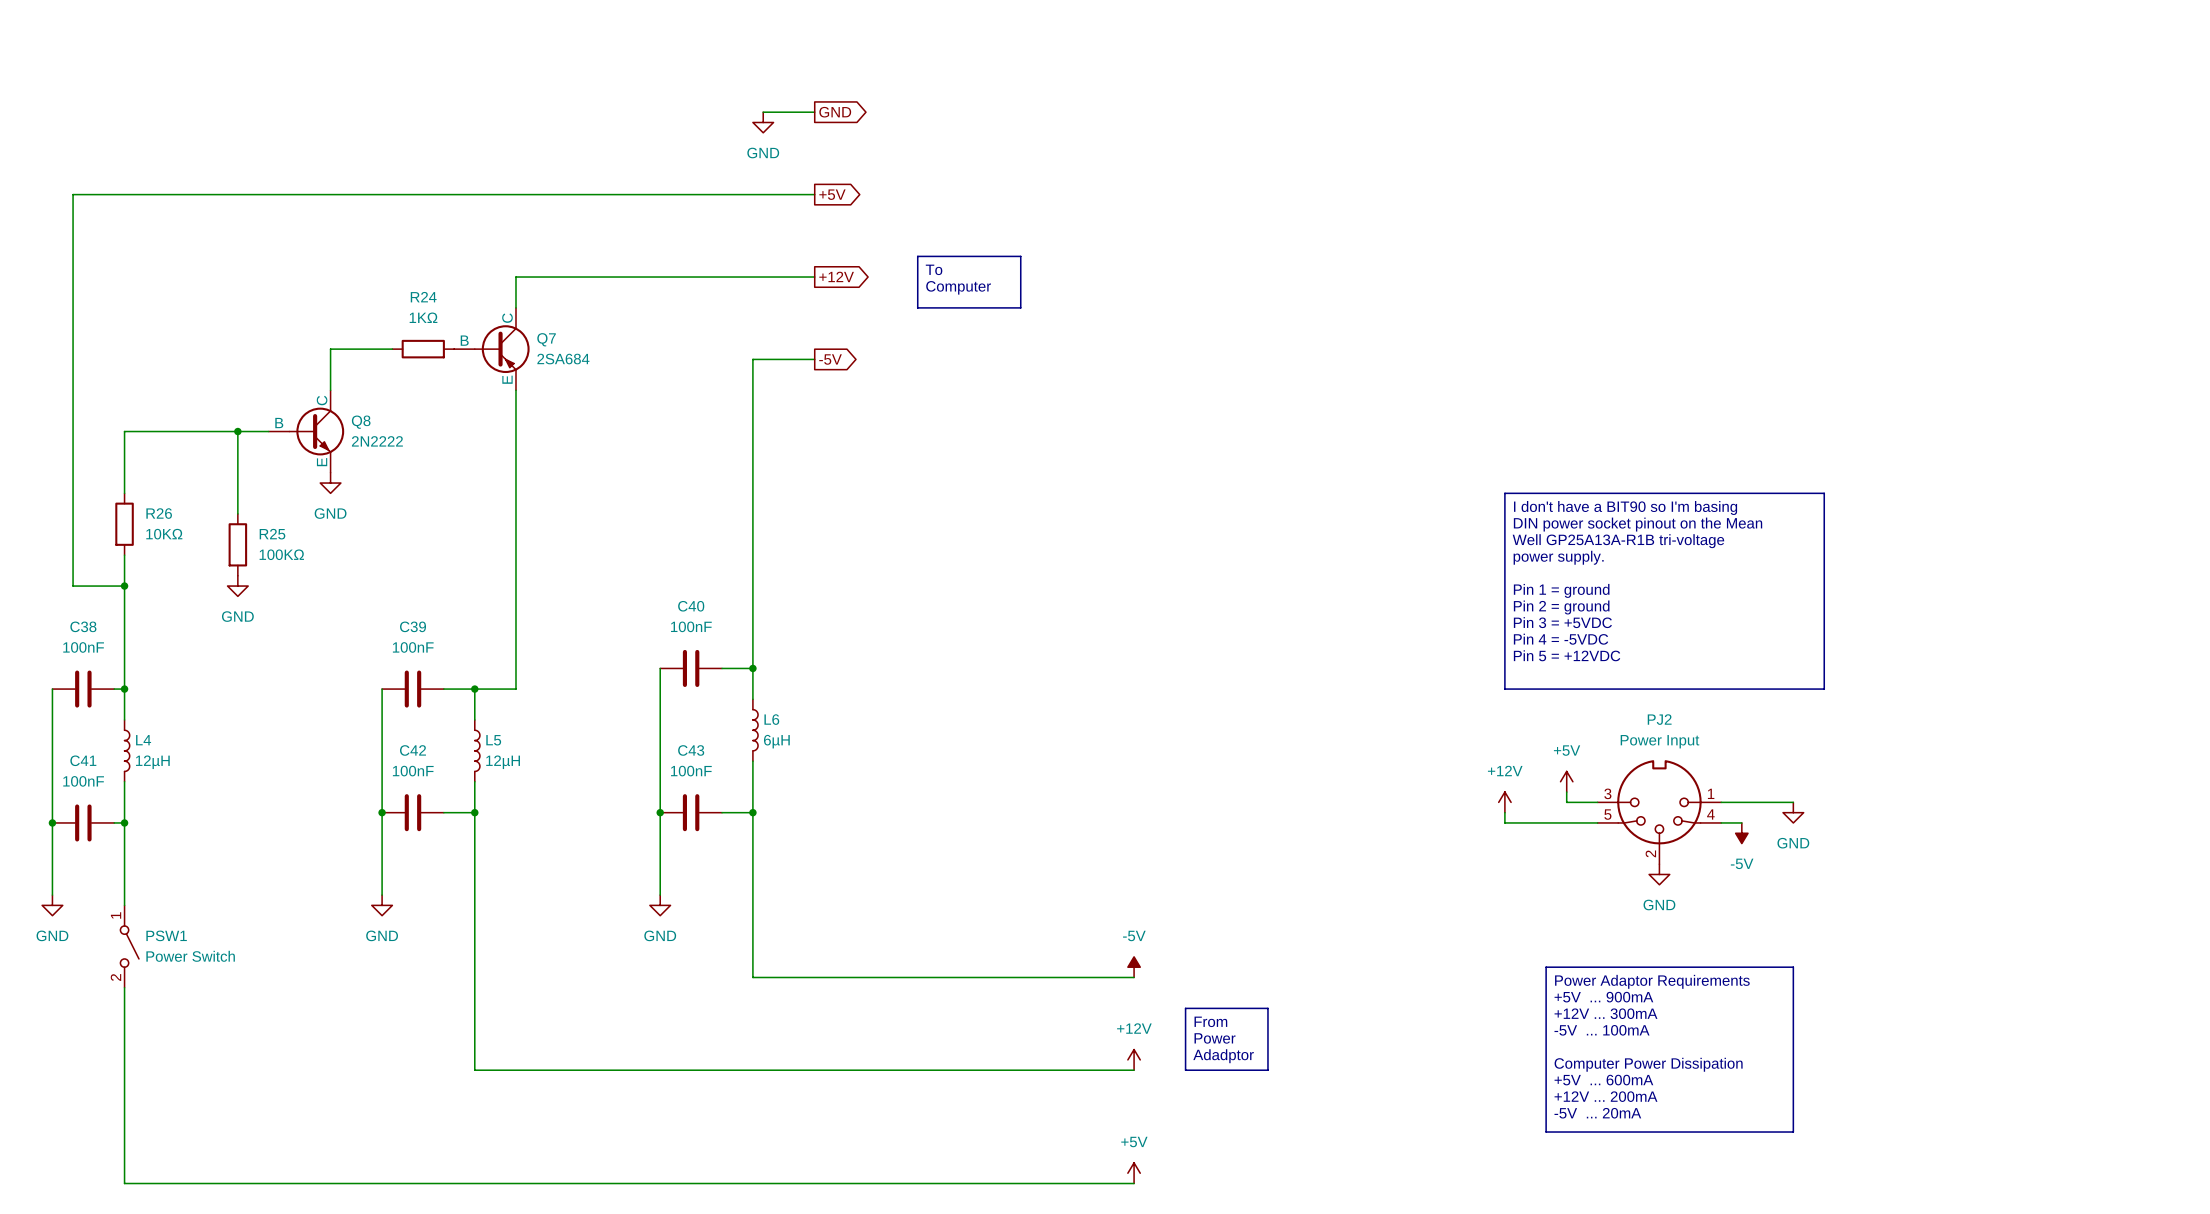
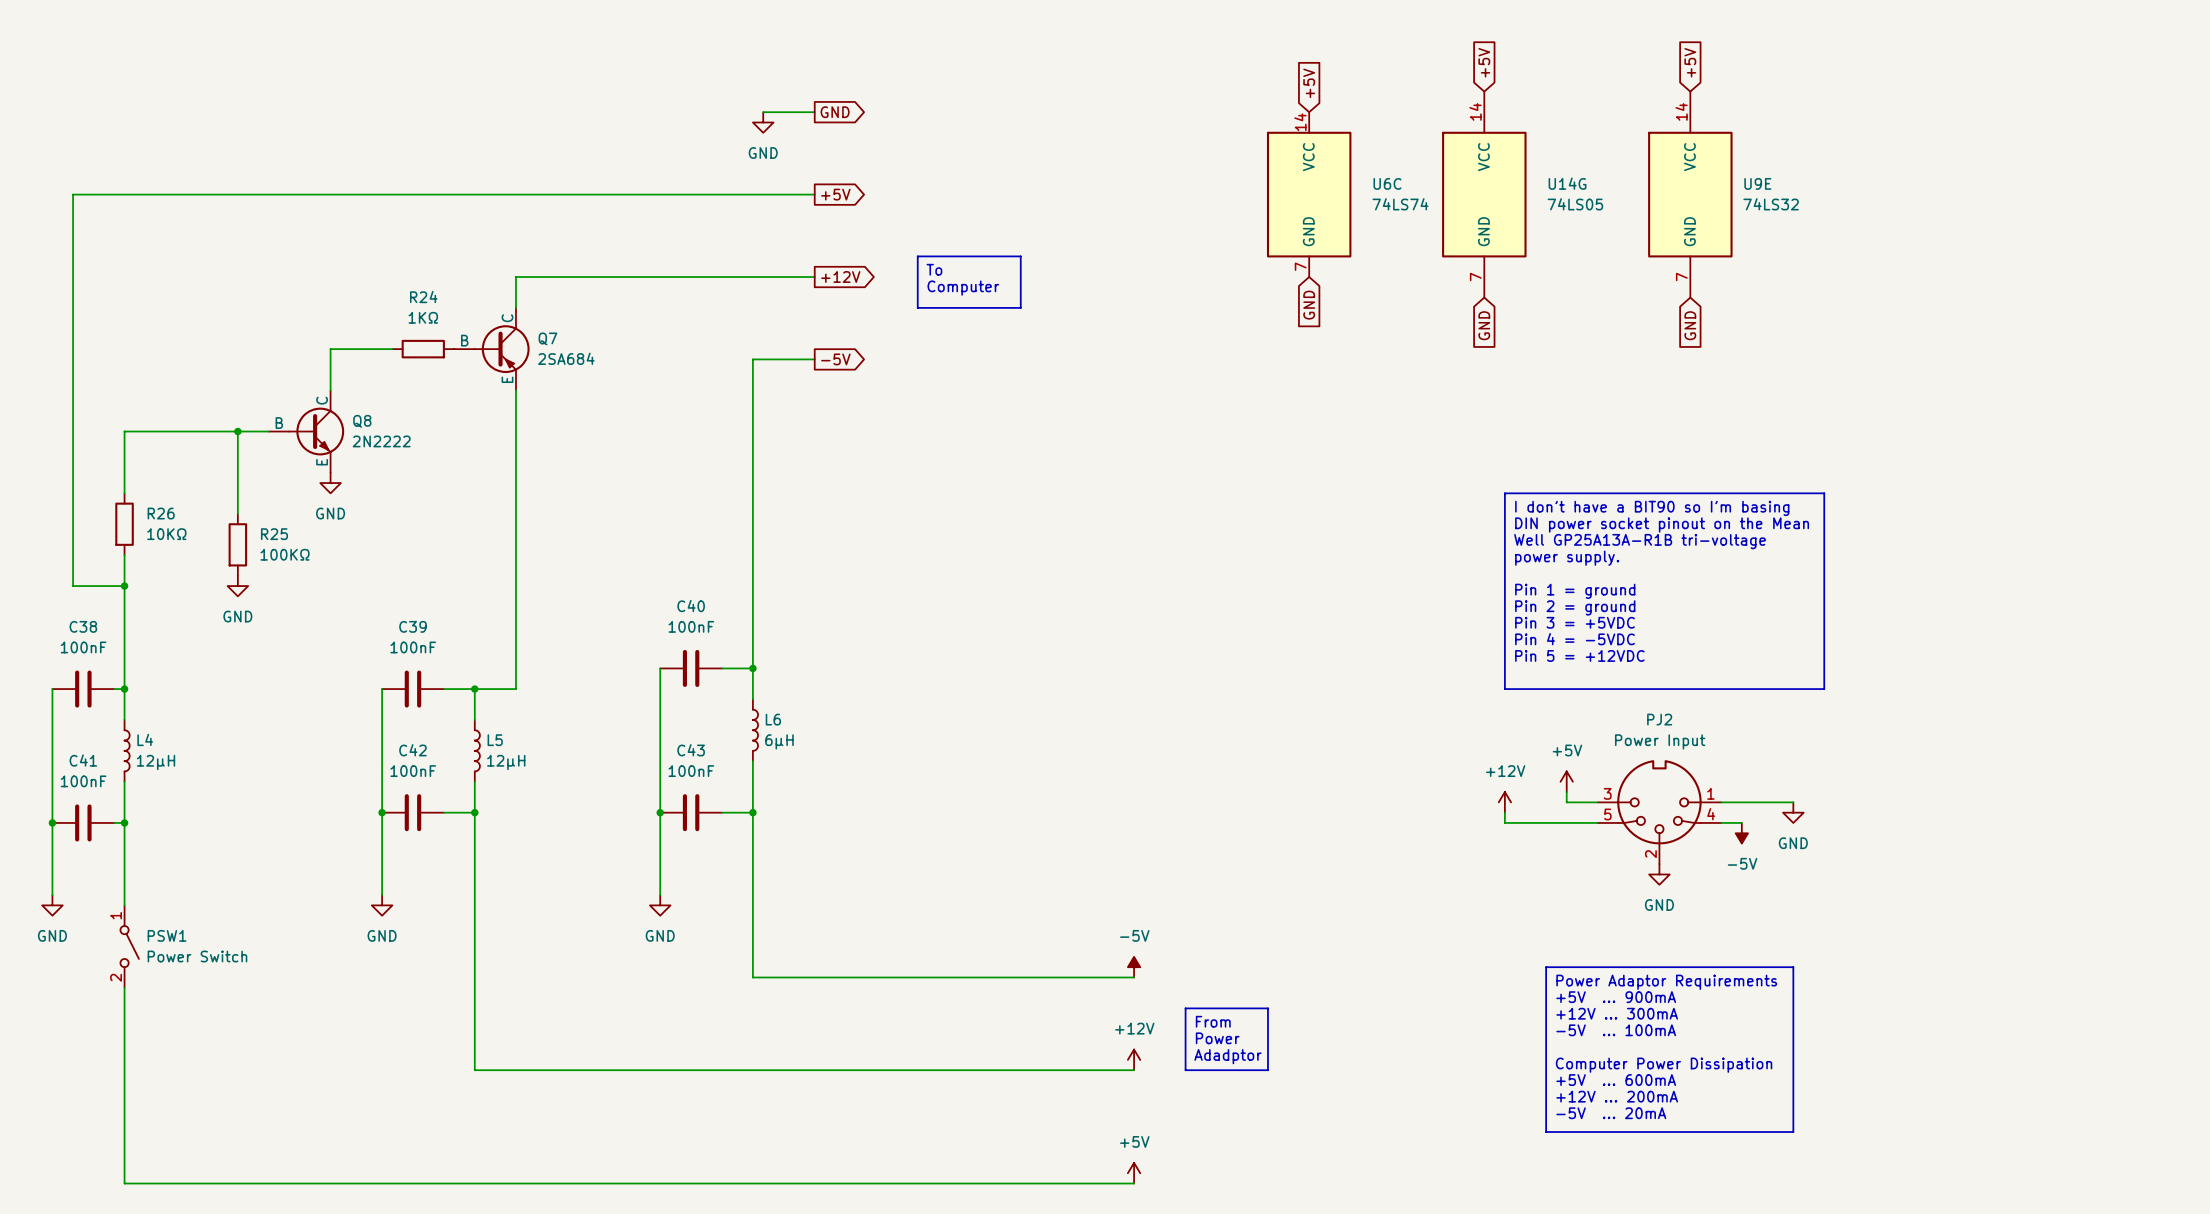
global label: none -> +5V (1484, 62)
global label: none -> +5V (1690, 62)
global label: none -> +5V (1309, 83)
U6C: none -> 74LS74 (1309, 194)
U14G: none -> 74LS05 (1484, 194)
U9E: none -> 74LS32 (1690, 194)
global label: none -> GND (1309, 305)
global label: none -> GND (1484, 325)
global label: none -> GND (1690, 325)

